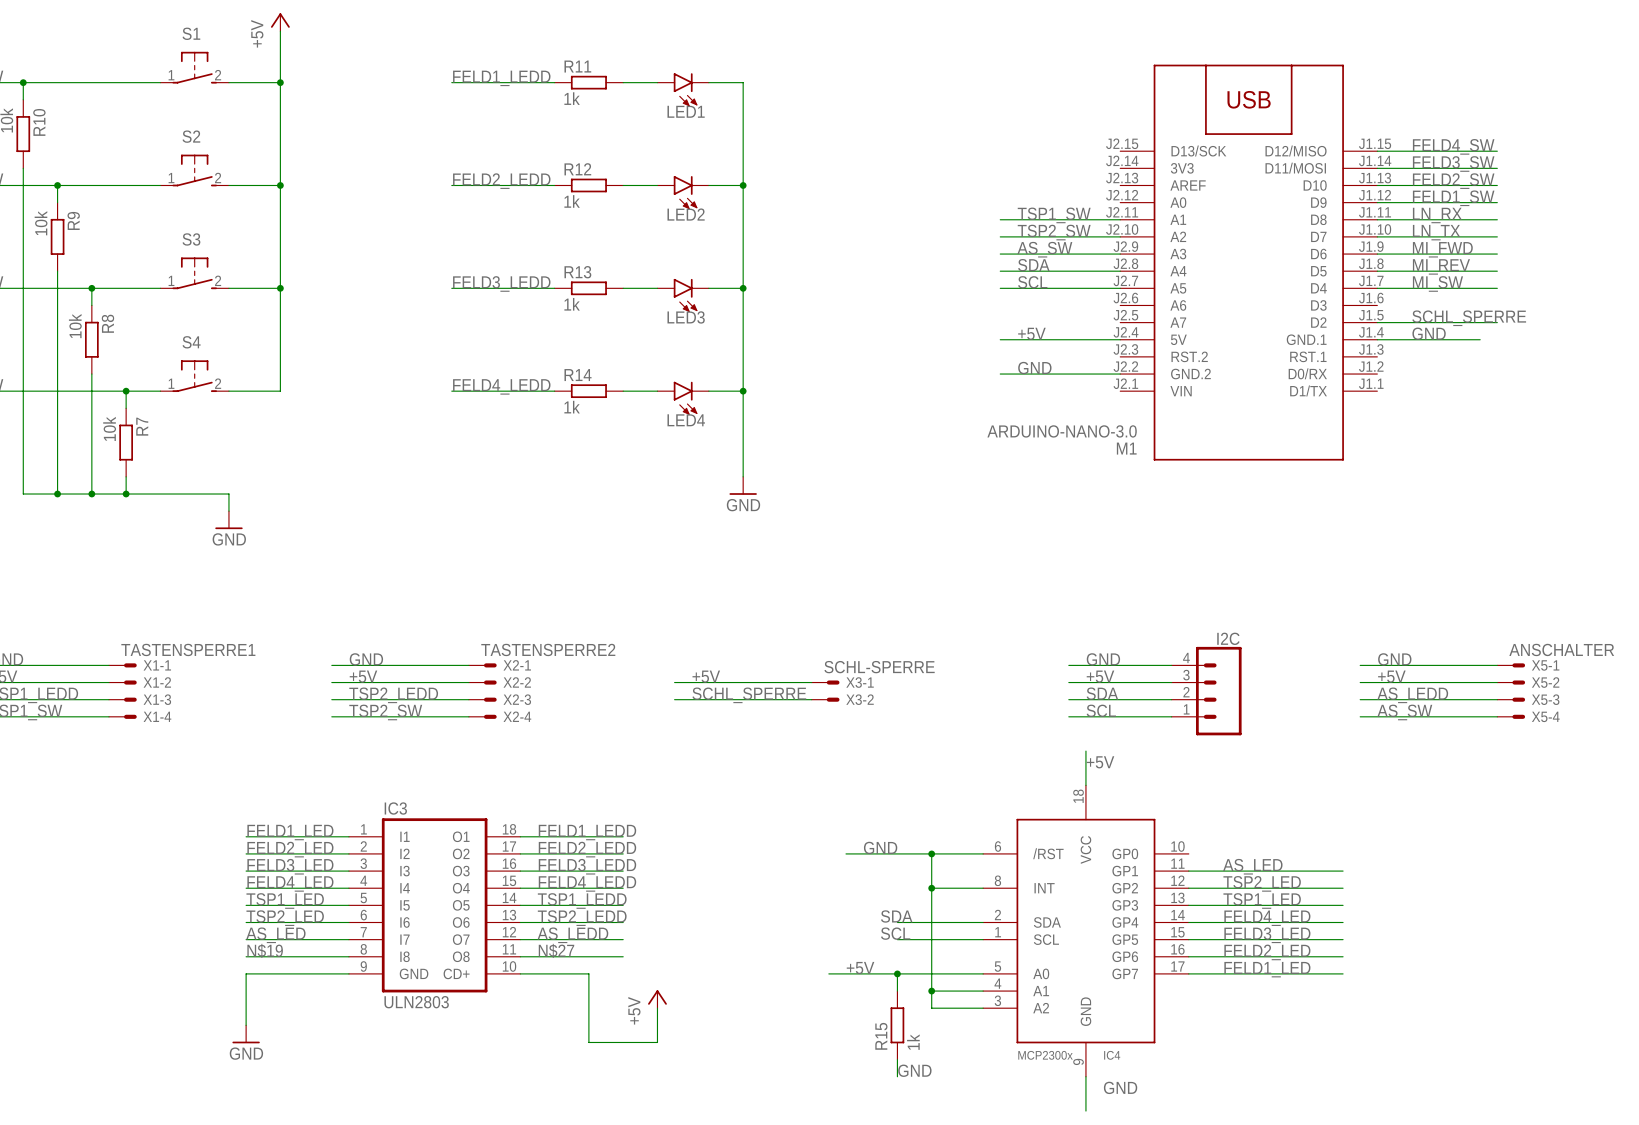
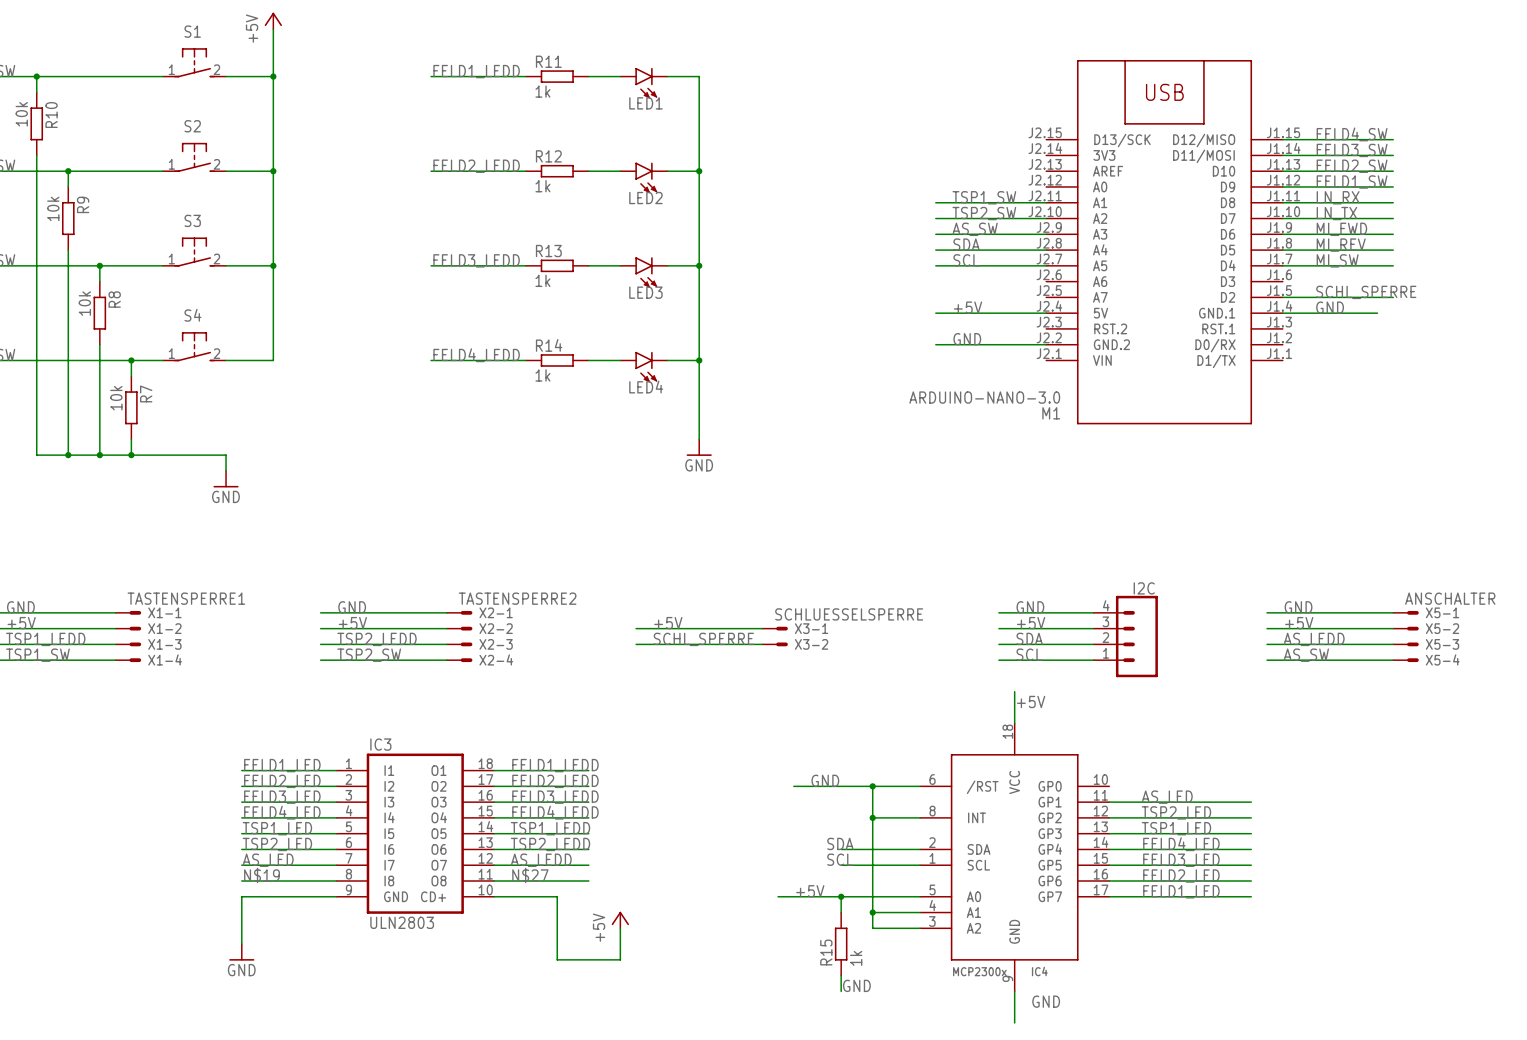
X3-1 value: SCHL-SPERRE (879, 667) -> SCHLUESSELSPERRE (849, 614)

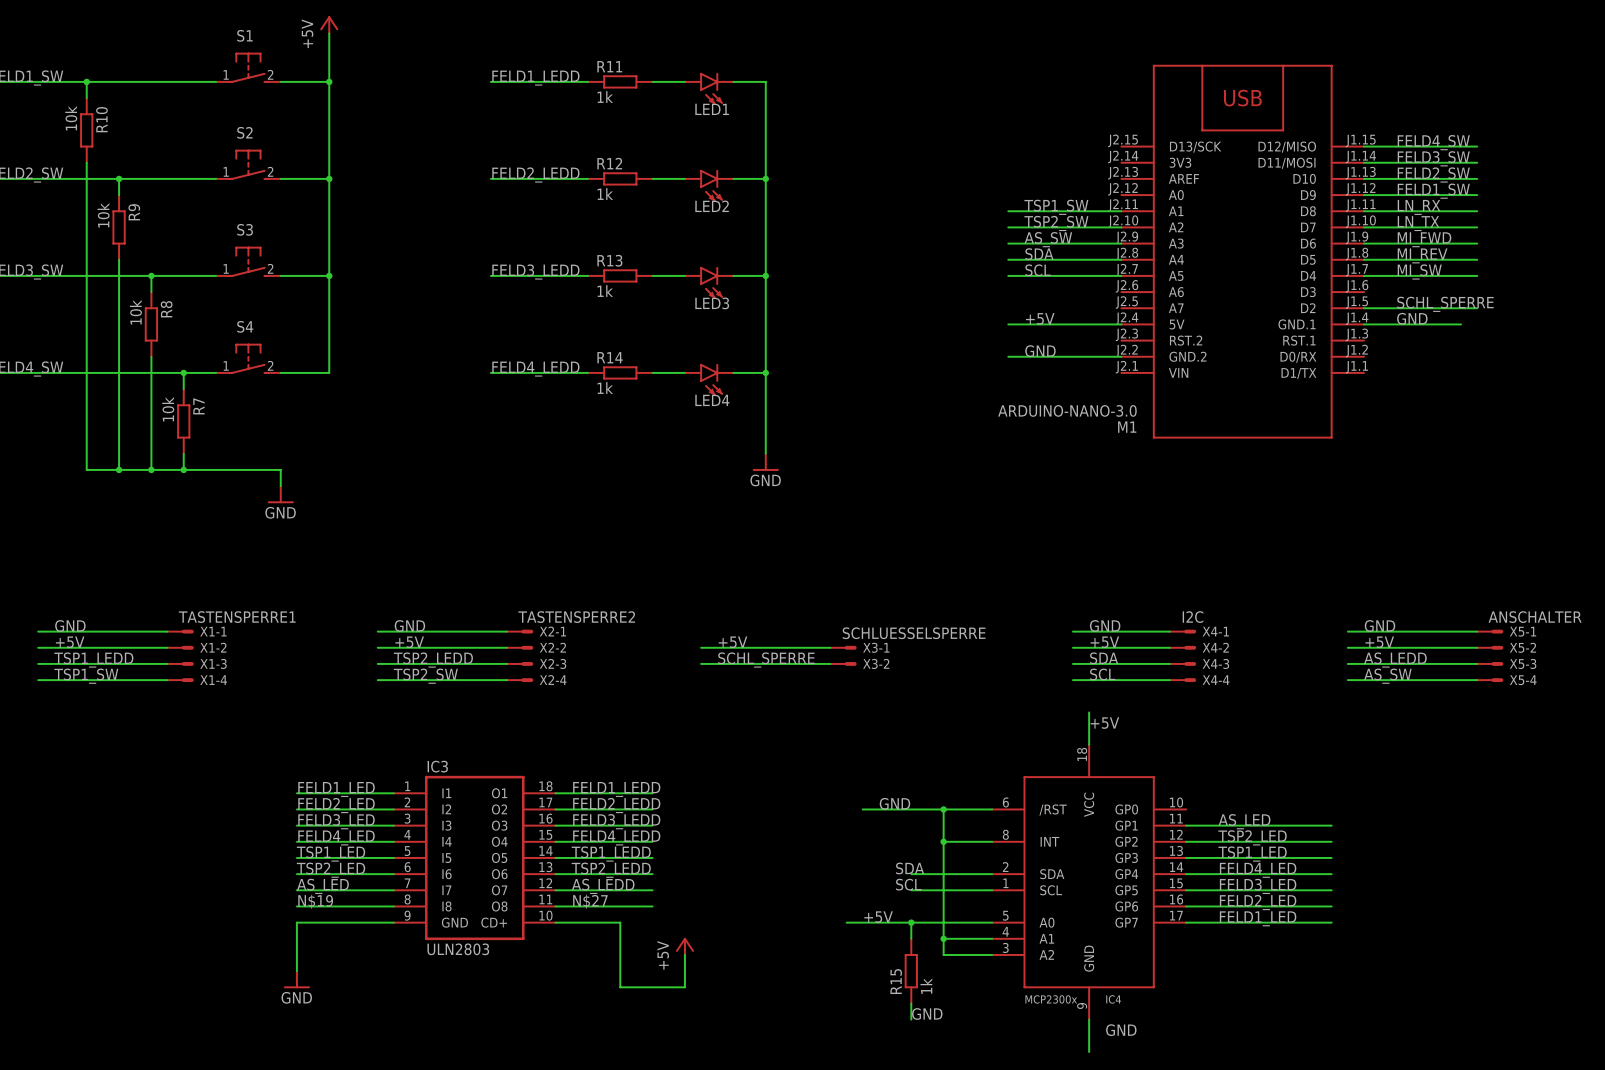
X4-1: none -> I2C (1183, 631)
X4-2: none -> (1183, 647)
I2C: (1125, 636) -> none
X4-3: none -> (1183, 663)
X4-4: none -> (1183, 680)

